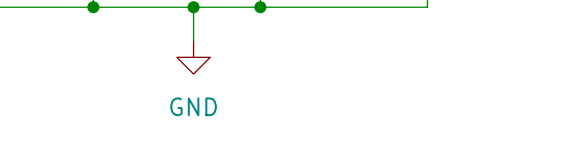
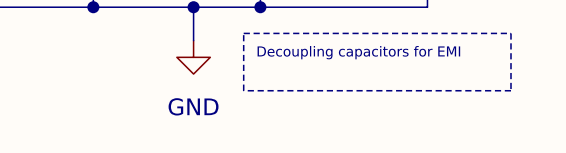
line: none -> (243, 33) (510, 33) (510, 90) (243, 90) (243, 33)
text: none -> Decoupling capacitors for EMI (358, 52)

